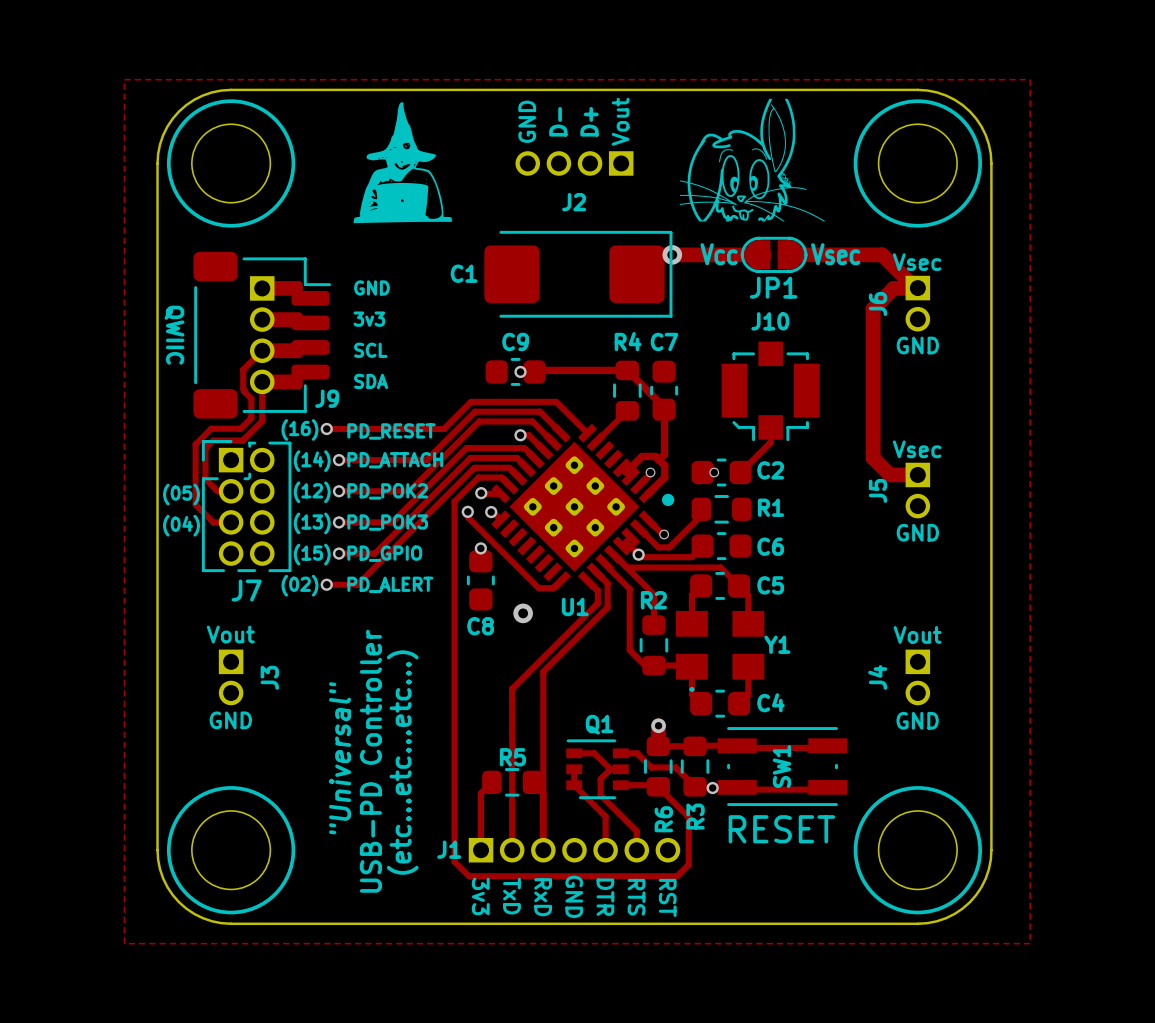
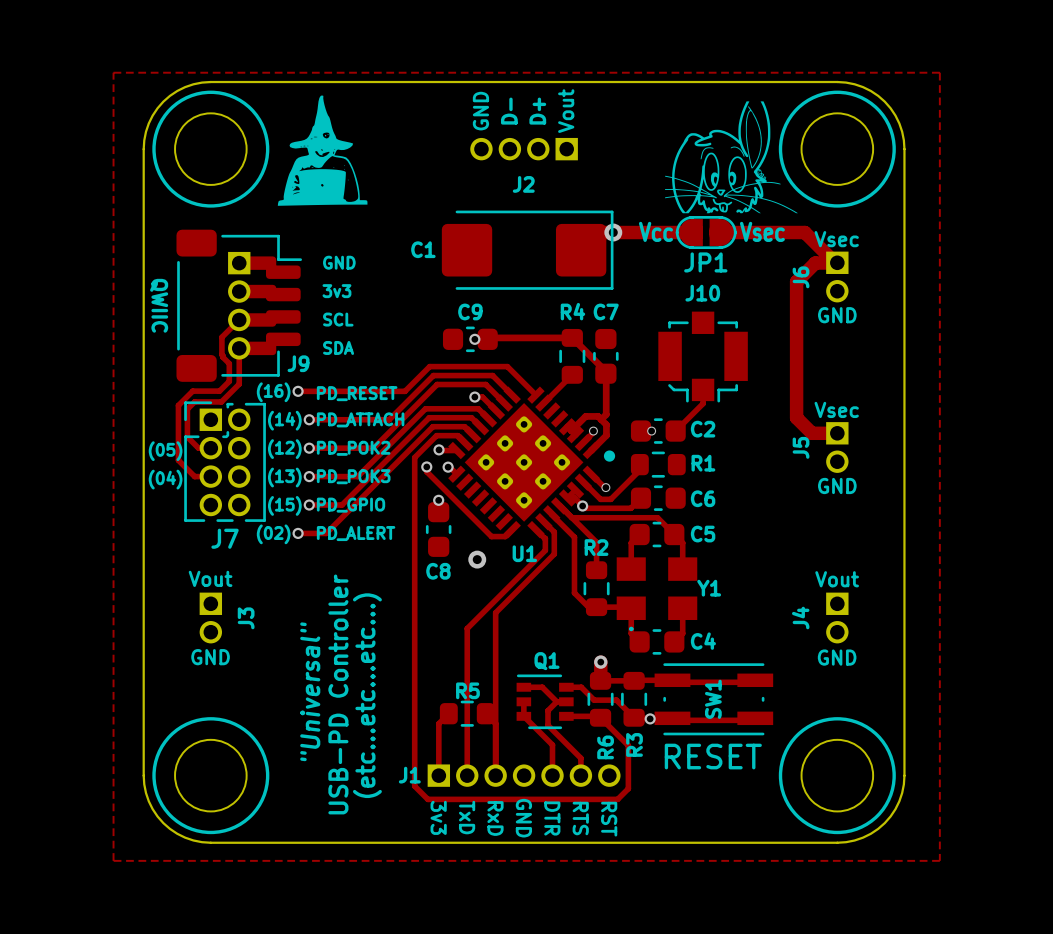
drawing position: (752, 160) -> (731, 157)
drawing position: (402, 162) -> (322, 150)

